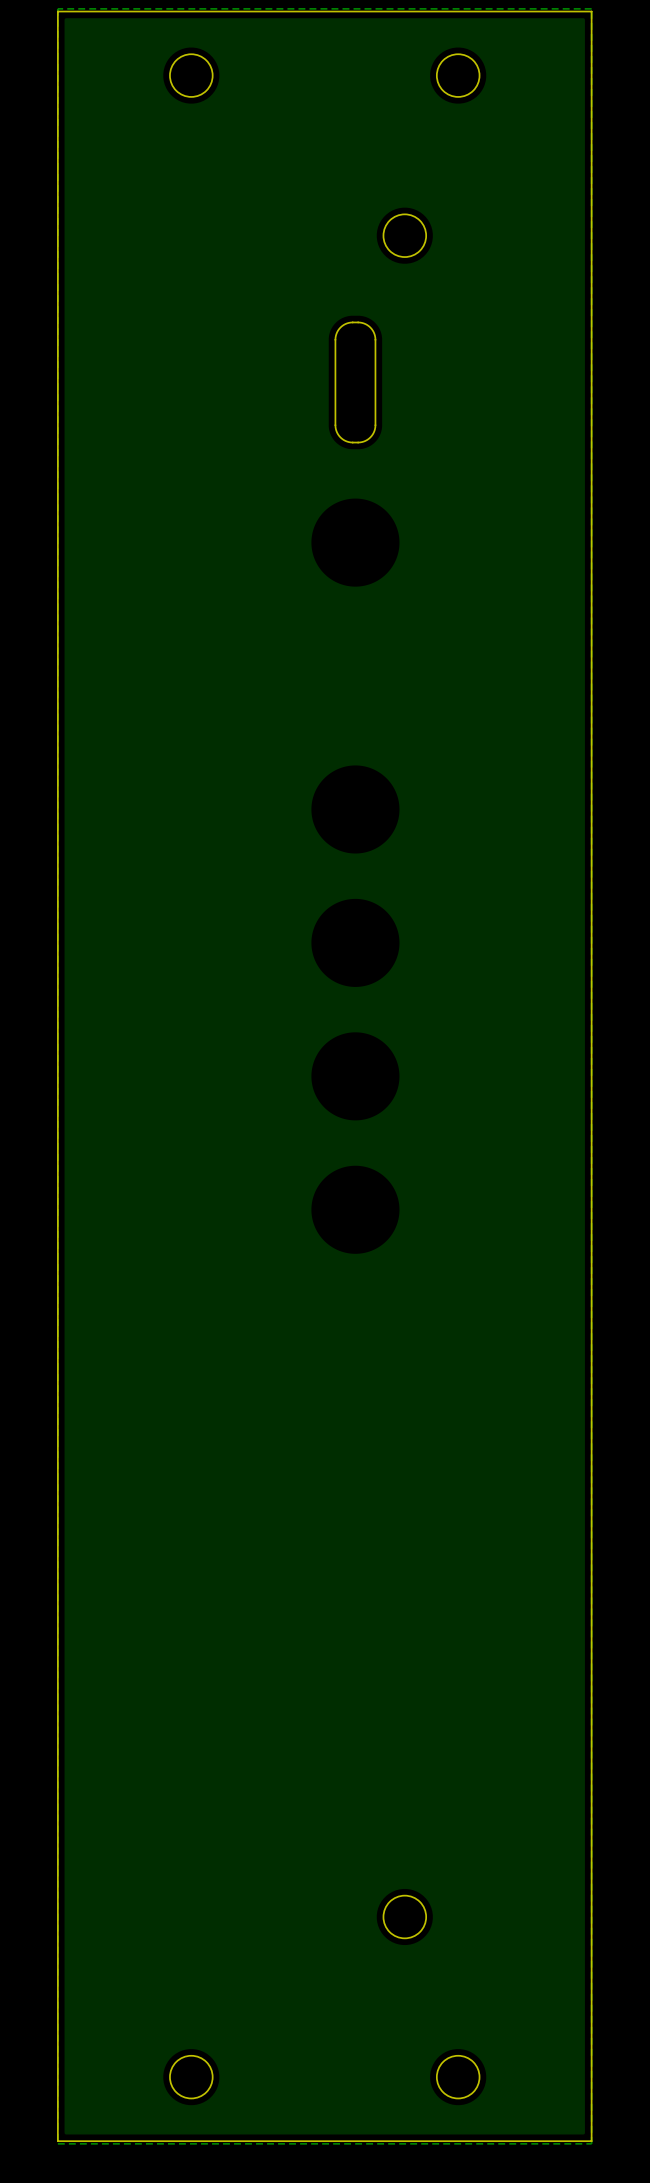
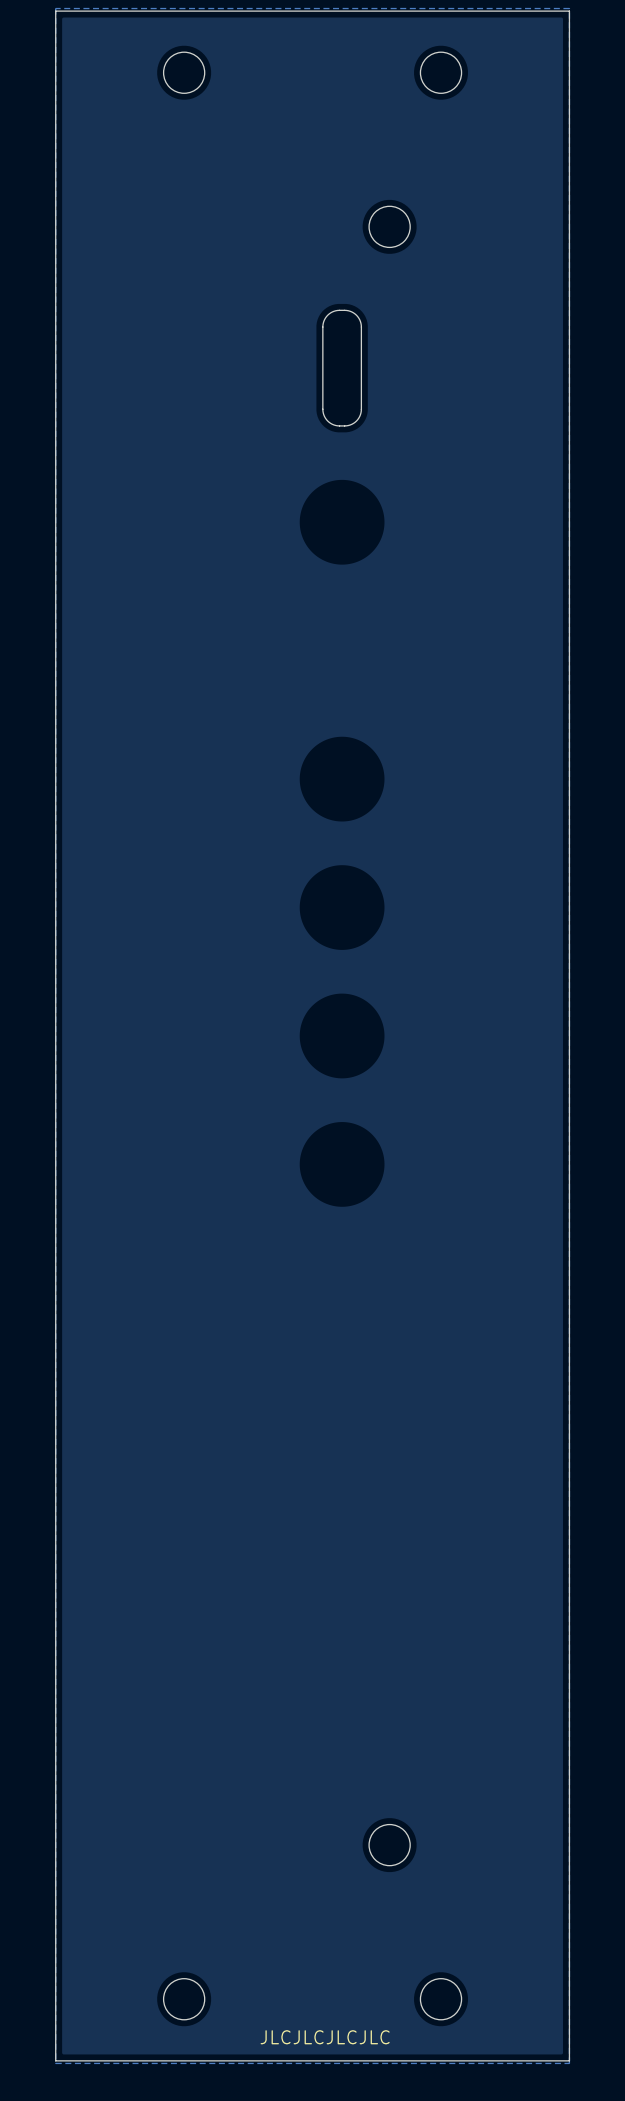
text: none -> JLCJLCJLCJLC (325, 2037)

